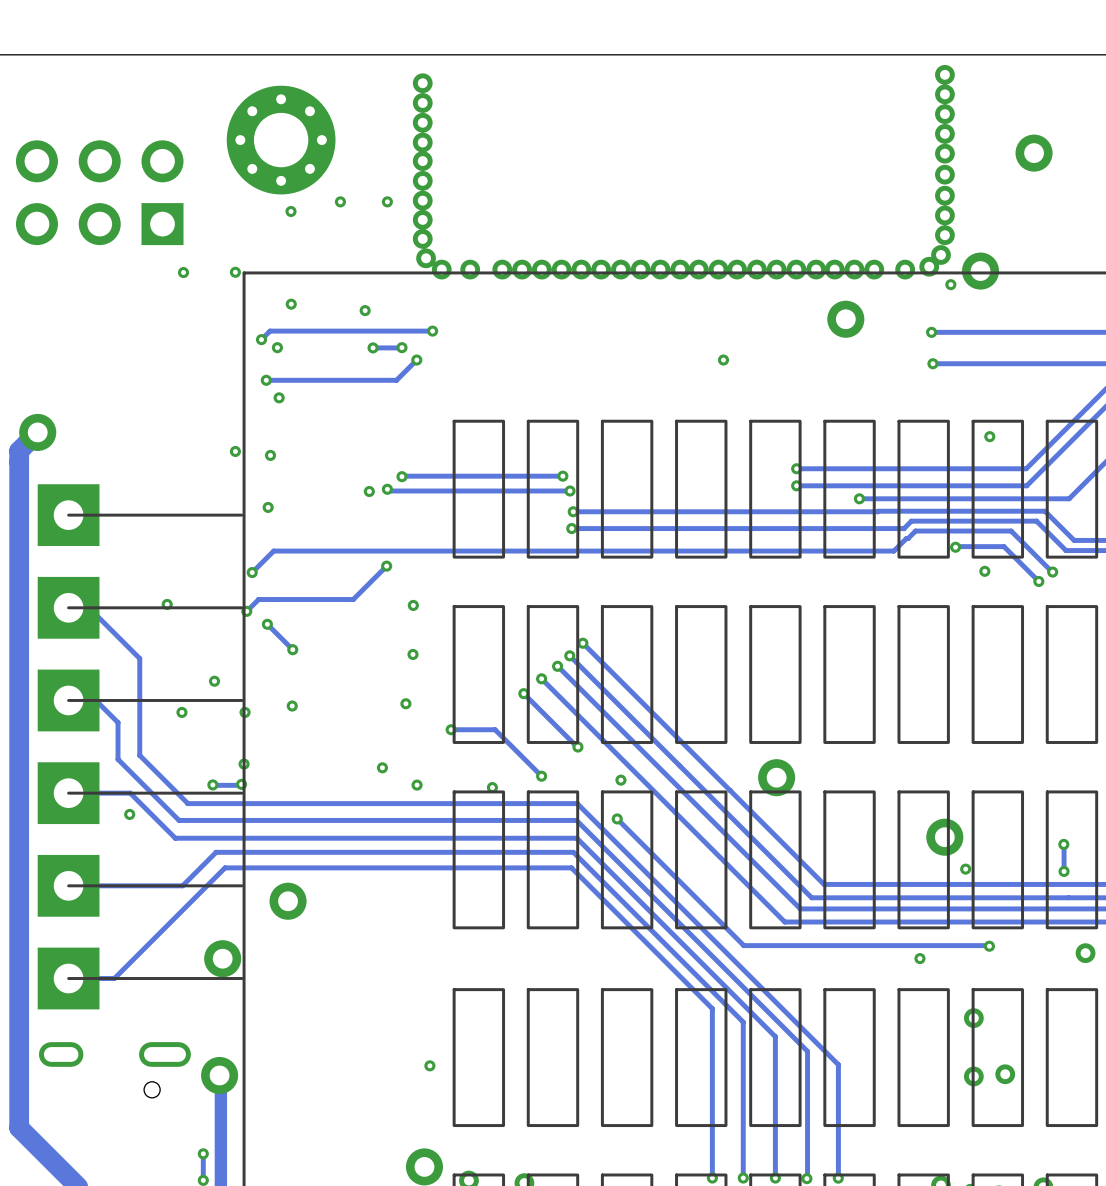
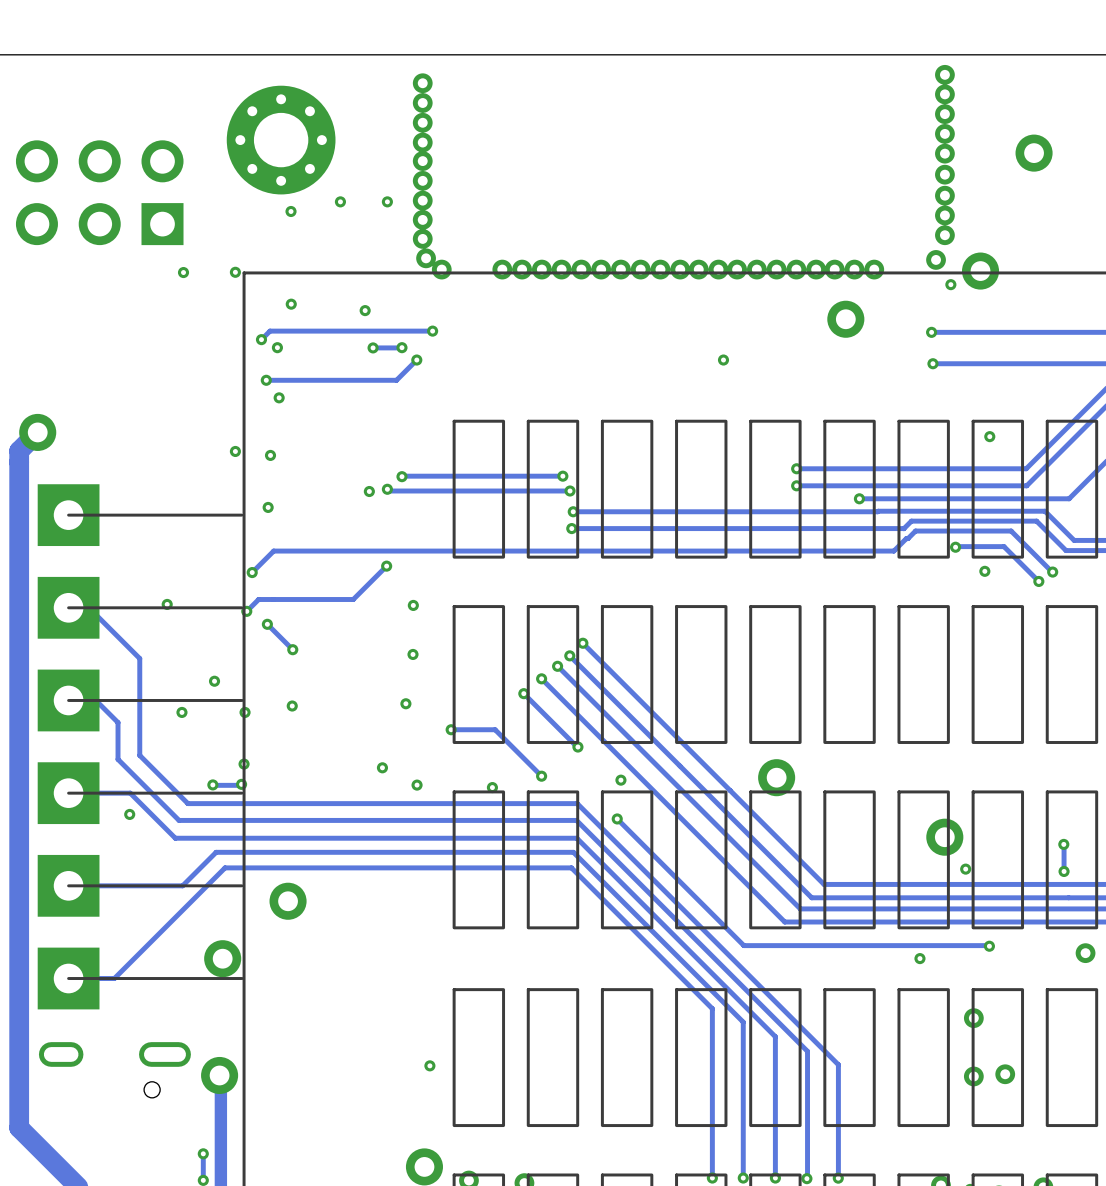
via: (940, 254) -> none
via: none -> (936, 259)
via: (929, 266) -> none
via: (470, 269) -> none
via: (905, 269) -> none

